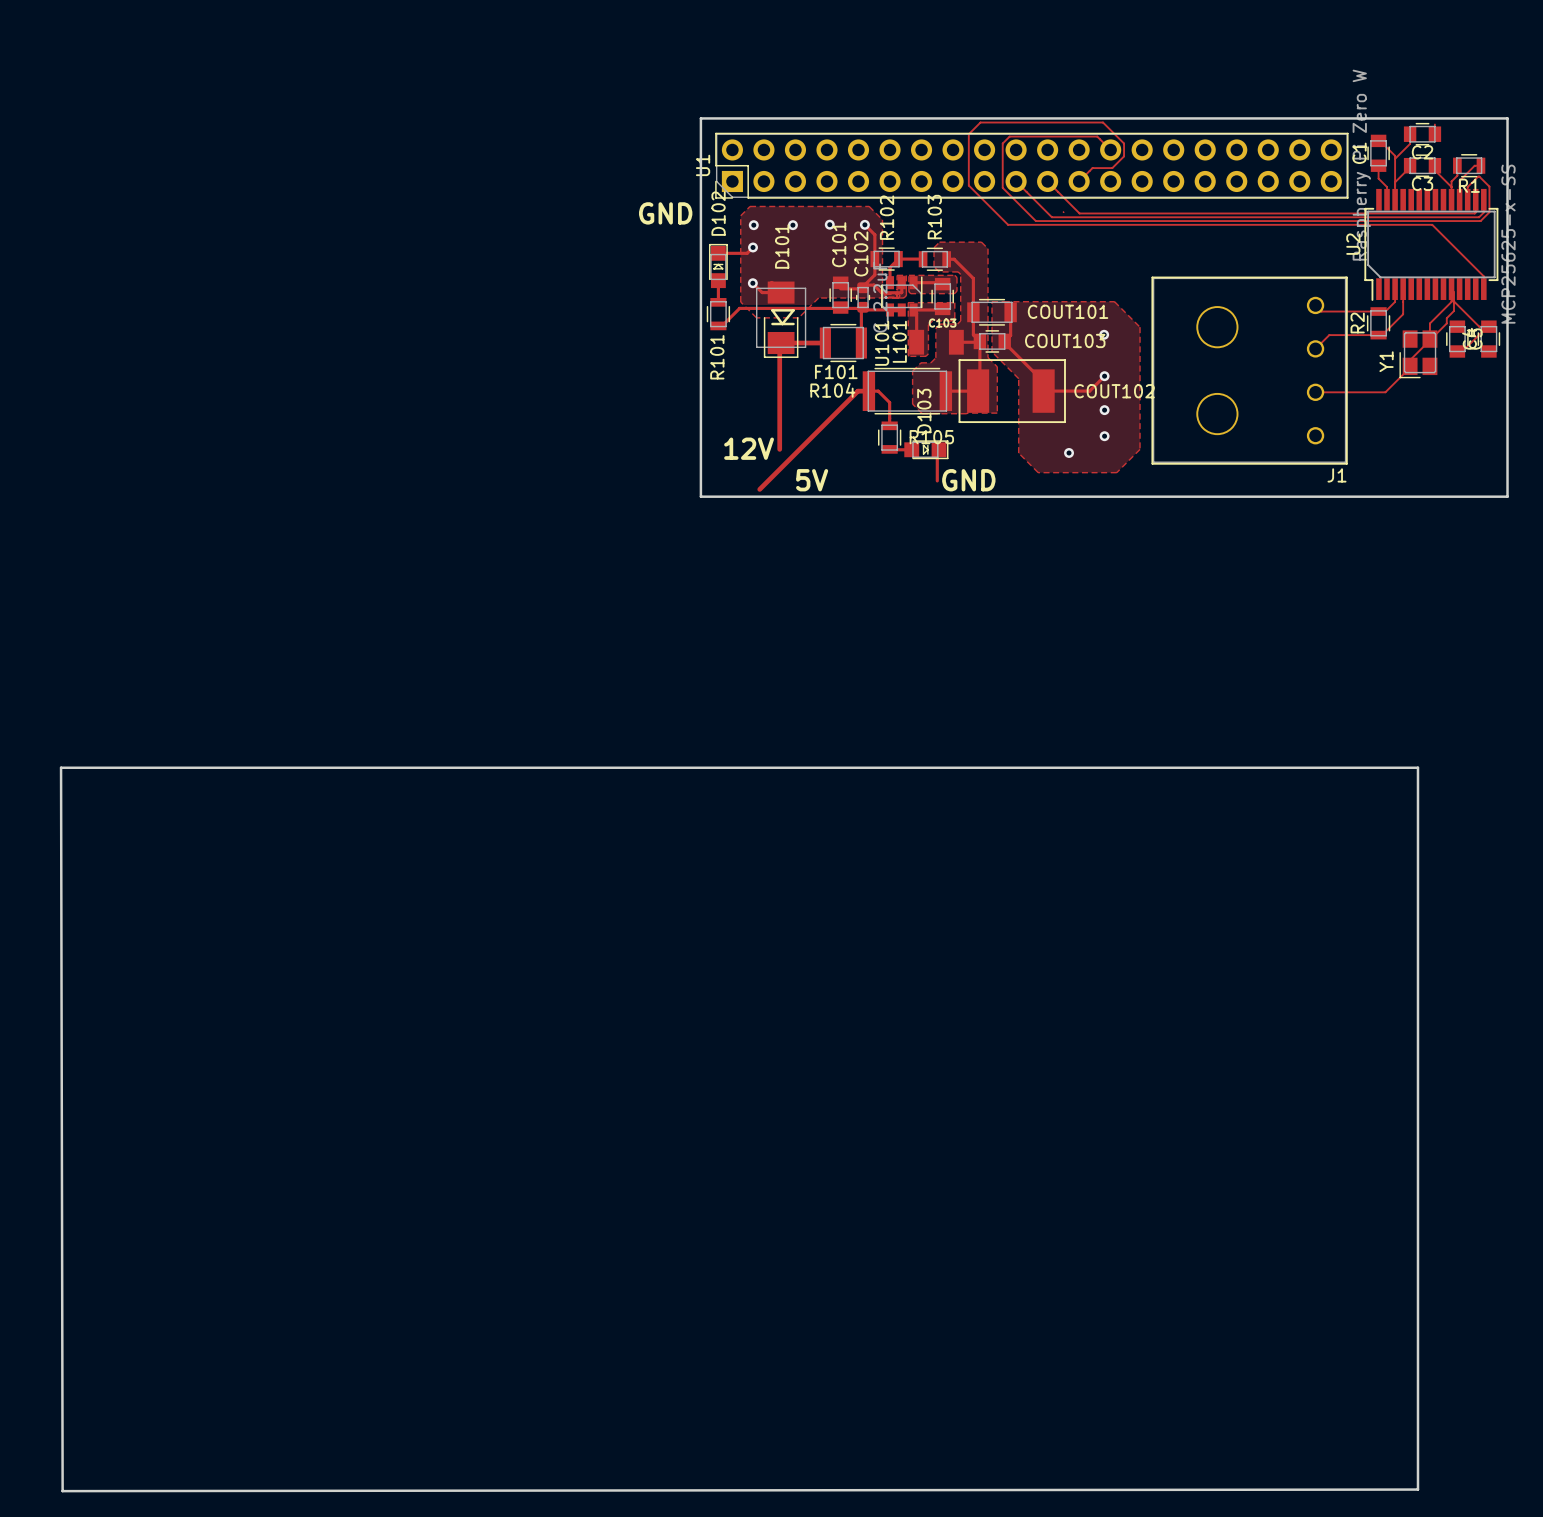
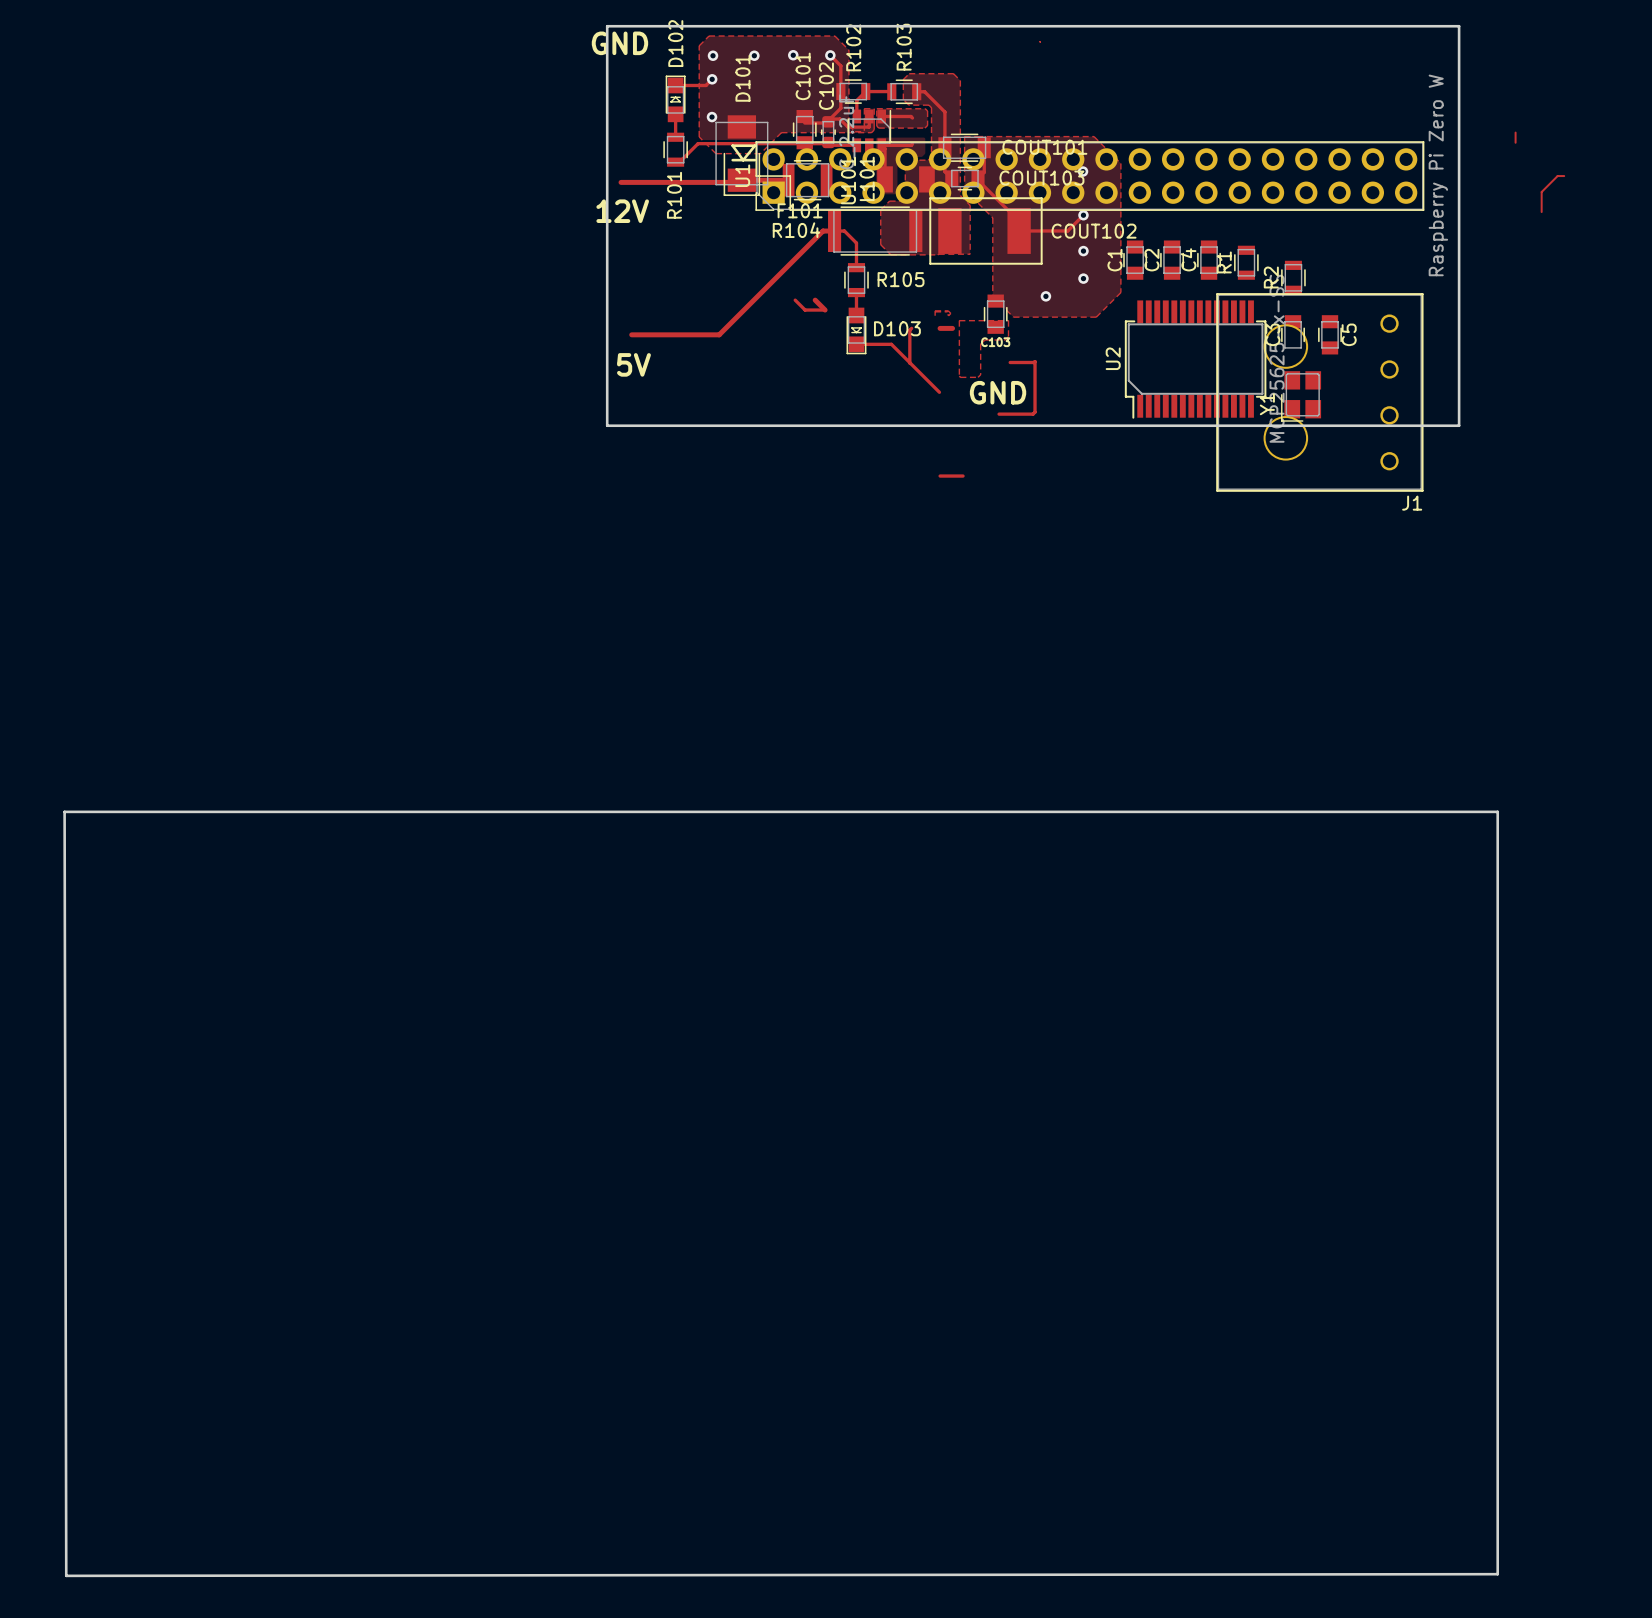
text: none -> GND (619, 43)
via: none -> (713, 55)
via: none -> (754, 55)
via: none -> (793, 55)
via: none -> (830, 55)
via: none -> (712, 79)
via: none -> (712, 117)
board edge: (700, 118) (1507, 118) (1507, 496) (700, 496) (700, 118) -> (607, 26) (1459, 26) (1459, 425) (607, 425) (607, 26)
track: (1410, 134) (1410, 143) (1395, 158) -> none
C2 rotation: 0° (1422, 134) -> 90° clockwise (1172, 260)
C2 position: (1422, 134) -> (1172, 260)
track: (1378, 140) (1395, 155) (1395, 199) -> none
track: (1110, 149) (1097, 136) (1009, 136) (1002, 143) (1002, 187) (1035, 221) (1480, 221) (1489, 212) (1489, 186) (1479, 176) (1467, 187) (1467, 199) -> none
C1 position: (1378, 153) -> (1135, 260)
via: none -> (1083, 171)
track: (1378, 165) (1378, 178) (1387, 187) (1387, 199) -> none
track: (1410, 165) (1395, 182) -> none
C3 rotation: 0° (1422, 165) -> 90° clockwise (1293, 334)
C3 position: (1422, 165) -> (1293, 334)
track: (1434, 165) (1434, 170) (1451, 187) -> none
track: (1457, 165) (1457, 175) (1451, 181) (1451, 199) -> none
R1 rotation: 0° (1469, 165) -> 90° clockwise (1246, 262)
R1 position: (1469, 165) -> (1246, 262)
track: none -> (788, 180) (741, 180) (739, 182) (621, 182)
track: (1016, 181) (1051, 217) (1479, 217) (1483, 212) (1483, 199) -> none
track: (1047, 181) (1079, 213) (1474, 213) (1475, 199) -> none
track: (1079, 181) (1092, 168) (1112, 168) (1124, 156) (1124, 143) (1103, 122) (980, 122) (968, 134) (968, 185) (1008, 224) (1432, 224) (1483, 276) (1483, 289) -> none
via: none -> (1083, 215)
zone outline: (750, 206) (740, 215) (740, 302) (756, 317) (798, 317) (818, 298) (903, 298) (906, 295) (906, 275) (897, 275) (897, 297) (888, 297) (882, 291) (882, 219) (869, 206) (750, 206) -> (709, 36) (699, 45) (699, 136) (715, 153) (760, 153) (781, 132) (871, 132) (874, 130) (874, 108) (864, 108) (864, 131) (855, 131) (848, 125) (848, 50) (834, 36) (709, 36)
zone outline: (1063, 211) (1063, 211) -> (1040, 41) (1040, 41)
text: GND (665, 213) -> none
via: (829, 224) -> none
track: (864, 224) (874, 234) (874, 274) (864, 285) -> (830, 55) (840, 65) (840, 108) (830, 119)
via: (864, 224) -> none
via: (753, 225) -> none
via: (792, 225) -> none
via: none -> (1083, 251)
zone outline: (939, 242) (934, 247) (934, 266) (939, 271) (958, 271) (960, 274) (960, 320) (957, 324) (940, 324) (935, 328) (935, 357) (930, 362) (920, 362) (912, 371) (912, 404) (922, 413) (997, 413) (997, 366) (988, 357) (988, 248) (981, 242) (939, 242) -> (909, 73) (903, 79) (903, 99) (908, 105) (928, 105) (931, 107) (931, 156) (928, 160) (909, 160) (905, 164) (905, 195) (900, 201) (889, 201) (880, 209) (880, 244) (890, 254) (970, 254) (970, 205) (960, 195) (960, 80) (953, 73) (909, 73)
U2 position: (1431, 244) -> (1195, 359)
track: (753, 246) (747, 253) (718, 253) -> (713, 78) (705, 85) (675, 85)
via: (753, 247) -> none
track: none -> (856, 267) (856, 243) (844, 231) (823, 231) (719, 334) (631, 334)
track: (946, 255) (946, 259) (954, 259) (973, 278) (973, 334) (979, 341) -> (916, 87) (916, 91) (924, 91) (944, 112) (944, 171) (951, 178)
R102 position: (886, 259) -> (853, 91)
track: (923, 259) (898, 259) (889, 267) (889, 282) -> (891, 91) (865, 91) (856, 100) (856, 116)
R103 position: (934, 259) -> (904, 91)
via: none -> (1083, 278)
D102 position: (718, 265) -> (675, 98)
zone outline: (908, 275) (954, 275) (956, 277) (956, 291) (954, 293) (910, 293) (908, 291) (908, 275) -> (876, 108) (925, 108) (927, 111) (927, 125) (924, 128) (878, 128) (876, 126) (876, 108)
track: none -> (856, 292) (856, 315)
via: none -> (1045, 296)
track: (718, 280) (718, 302) -> (675, 114) (675, 137)
track: (901, 282) (901, 292) (881, 292) (873, 285) (863, 285) (859, 288) (840, 288) -> (869, 116) (868, 127) (847, 127) (839, 119) (828, 119) (824, 123) (804, 123)
track: (913, 282) (942, 284) -> (881, 116) (912, 118)
via: (752, 283) -> none
track: (1395, 289) (1395, 301) (1385, 311) (1321, 311) (1315, 305) -> none
track: (1403, 289) (1403, 314) (1382, 335) (1329, 335) (1315, 348) -> none
track: (1451, 289) (1451, 301) (1429, 323) (1429, 339) -> none
track: (1453, 291) (1453, 311) (1446, 318) (1446, 323) (1410, 360) (1410, 367) (1385, 392) (1315, 392) -> none
C101 position: (840, 295) -> (804, 129)
U101 position: (901, 296) -> (869, 130)
C102 position: (863, 297) -> (828, 132)
track: (1451, 298) (1479, 326) (1490, 326) -> none
zone outline: (992, 301) (1114, 301) (1140, 327) (1140, 449) (1116, 472) (1038, 472) (1018, 453) (1018, 378) (992, 351) (992, 301) -> (964, 136) (1094, 136) (1120, 163) (1120, 292) (1096, 317) (1013, 317) (992, 296) (992, 217) (964, 189) (964, 136)
track: (942, 308) (913, 309) (916, 313) (916, 342) (913, 339) -> (912, 144) (881, 145) (885, 148) (885, 179) (881, 176)
track: (889, 309) (739, 308) (722, 325) (718, 325) -> (856, 145) (698, 143) (679, 162) (675, 162)
COUT101 position: (992, 312) -> (964, 147)
track: (1010, 312) (1010, 335) (1004, 342) (1043, 381) (1043, 391) (1089, 391) (1104, 376) -> (984, 147) (984, 172) (978, 180) (1019, 221) (1019, 230) (1067, 230) (1083, 215)
R101 position: (718, 314) -> (675, 149)
D101 position: (781, 319) -> (741, 155)
R2 position: (1378, 323) -> (1293, 277)
track: none -> (856, 344) (891, 344) (939, 392)
track: (1487, 326) (1462, 351) (1457, 351) -> none
via: (1104, 334) -> none
track: (779, 337) (779, 449) -> none
C5 position: (1457, 339) -> (1330, 334)
C4 position: (1488, 339) -> (1209, 260)
COUT103 position: (992, 341) -> (964, 178)
L101 position: (936, 342) -> (905, 179)
track: (825, 343) (781, 343) (779, 345) -> none
F101 position: (843, 343) -> (807, 180)
Y1 position: (1418, 354) -> (1301, 396)
via: (1104, 376) -> none
R104 position: (907, 391) -> (875, 231)
COUT102 position: (1012, 391) -> (985, 230)
via: (1104, 410) -> none
track: (889, 425) (889, 402) (878, 391) (857, 391) (759, 489) -> none
via: (1104, 436) -> none
R105 position: (889, 437) -> (856, 280)
track: (937, 447) (937, 480) -> none
text position: 12V (749, 448) -> 12V (622, 211)
D103 rotation: 0° (926, 449) -> 90° clockwise (856, 330)
D103 position: (926, 449) -> (856, 330)
via: (1069, 452) -> none
text position: 5V (812, 480) -> 5V (633, 364)
text position: GND (968, 480) -> GND (998, 392)

